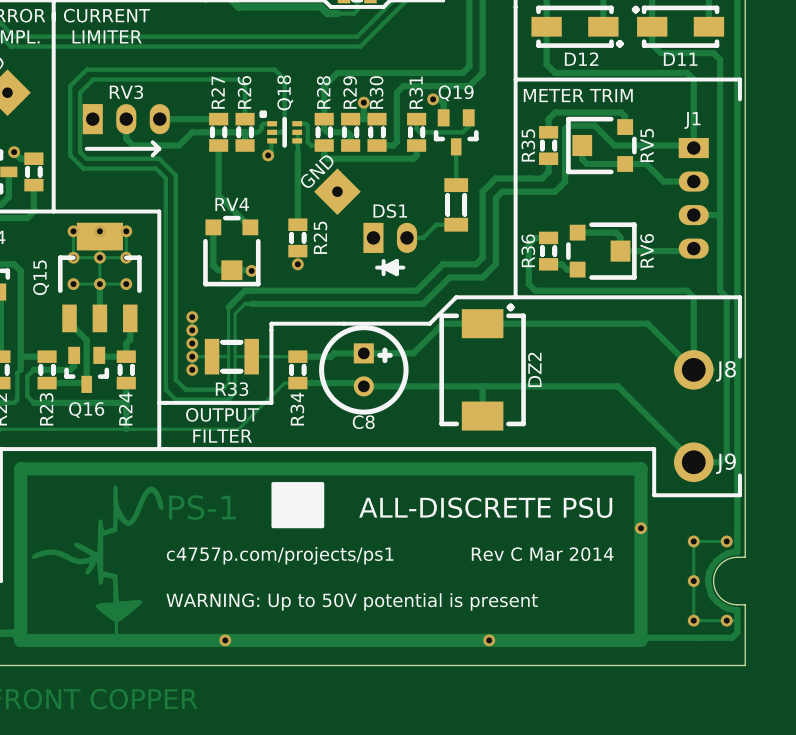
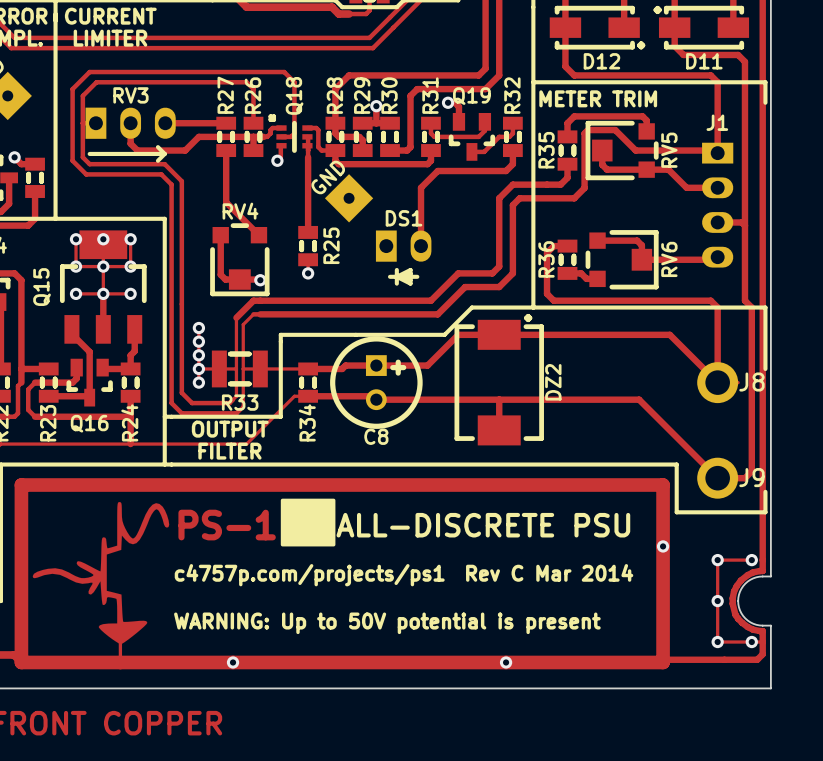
R32: none -> (512, 136)
track: (456, 146) (456, 185) -> (471, 151) (484, 151) (499, 136) (509, 136) (512, 133) (512, 123)
part: (456, 204) -> none
track: (456, 224) (436, 224) (423, 237) (406, 237) -> (512, 150) (512, 164) (506, 171) (437, 171) (421, 187) (421, 246)

